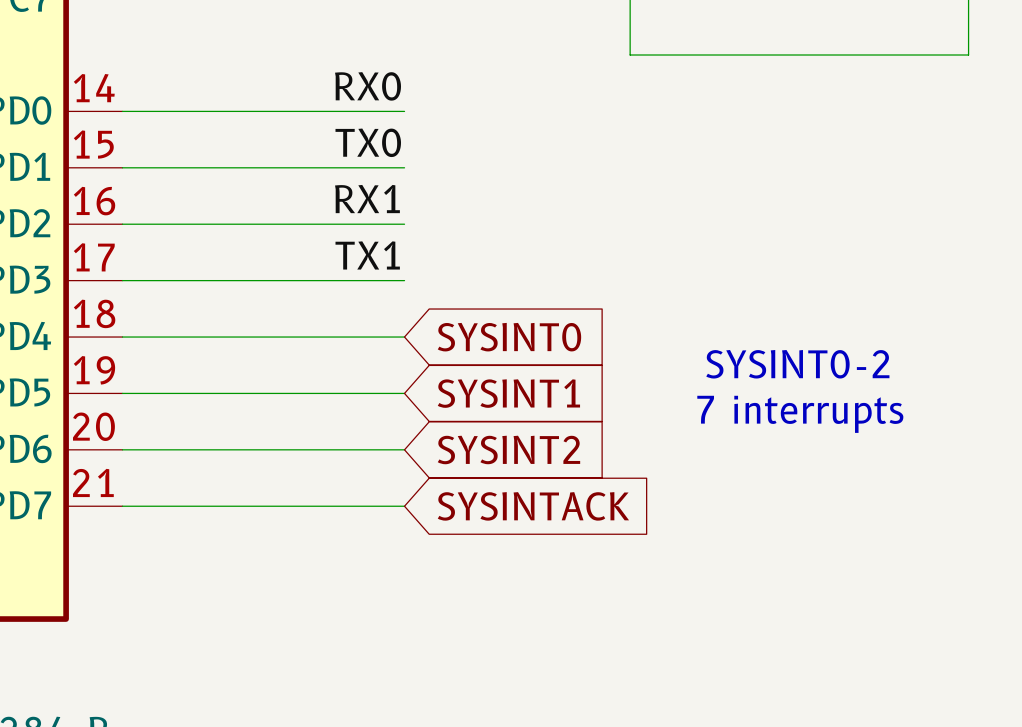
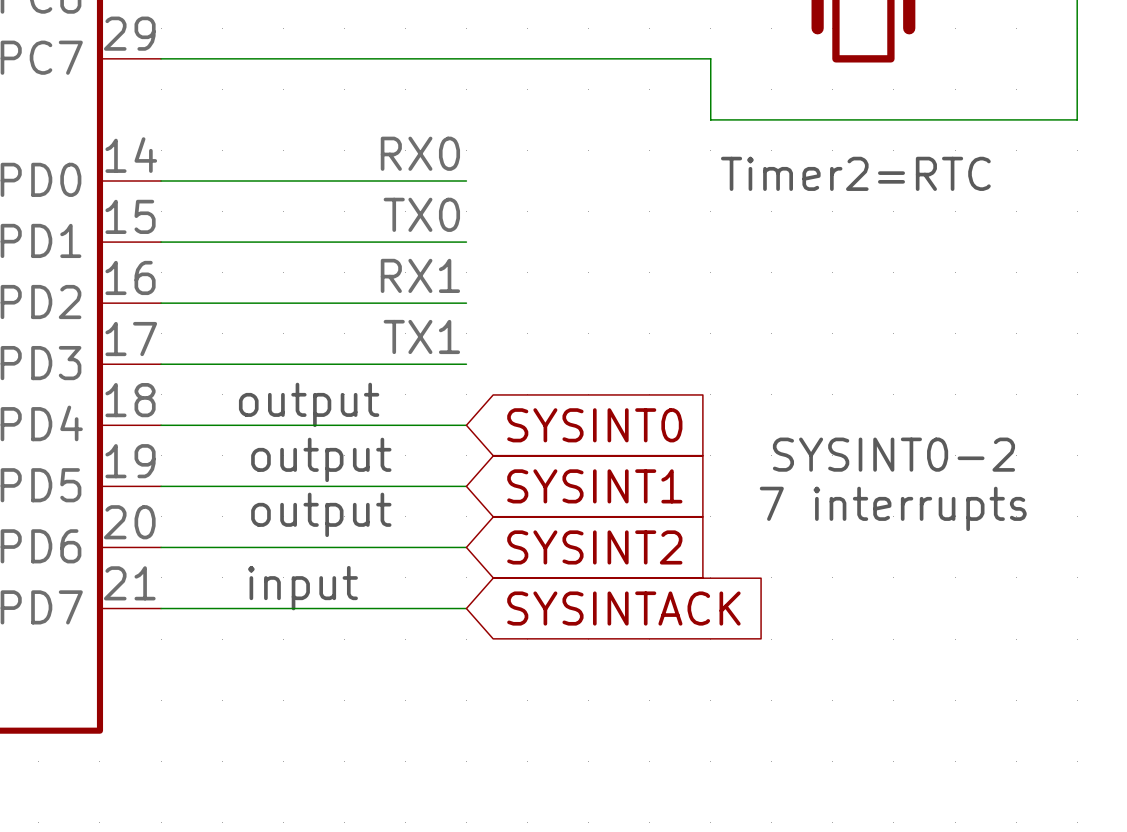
text: none -> Timer2=RTC (855, 173)
text: none -> output (309, 404)
text: none -> output (321, 459)
text: none -> output (321, 514)
text: none -> input (302, 588)

